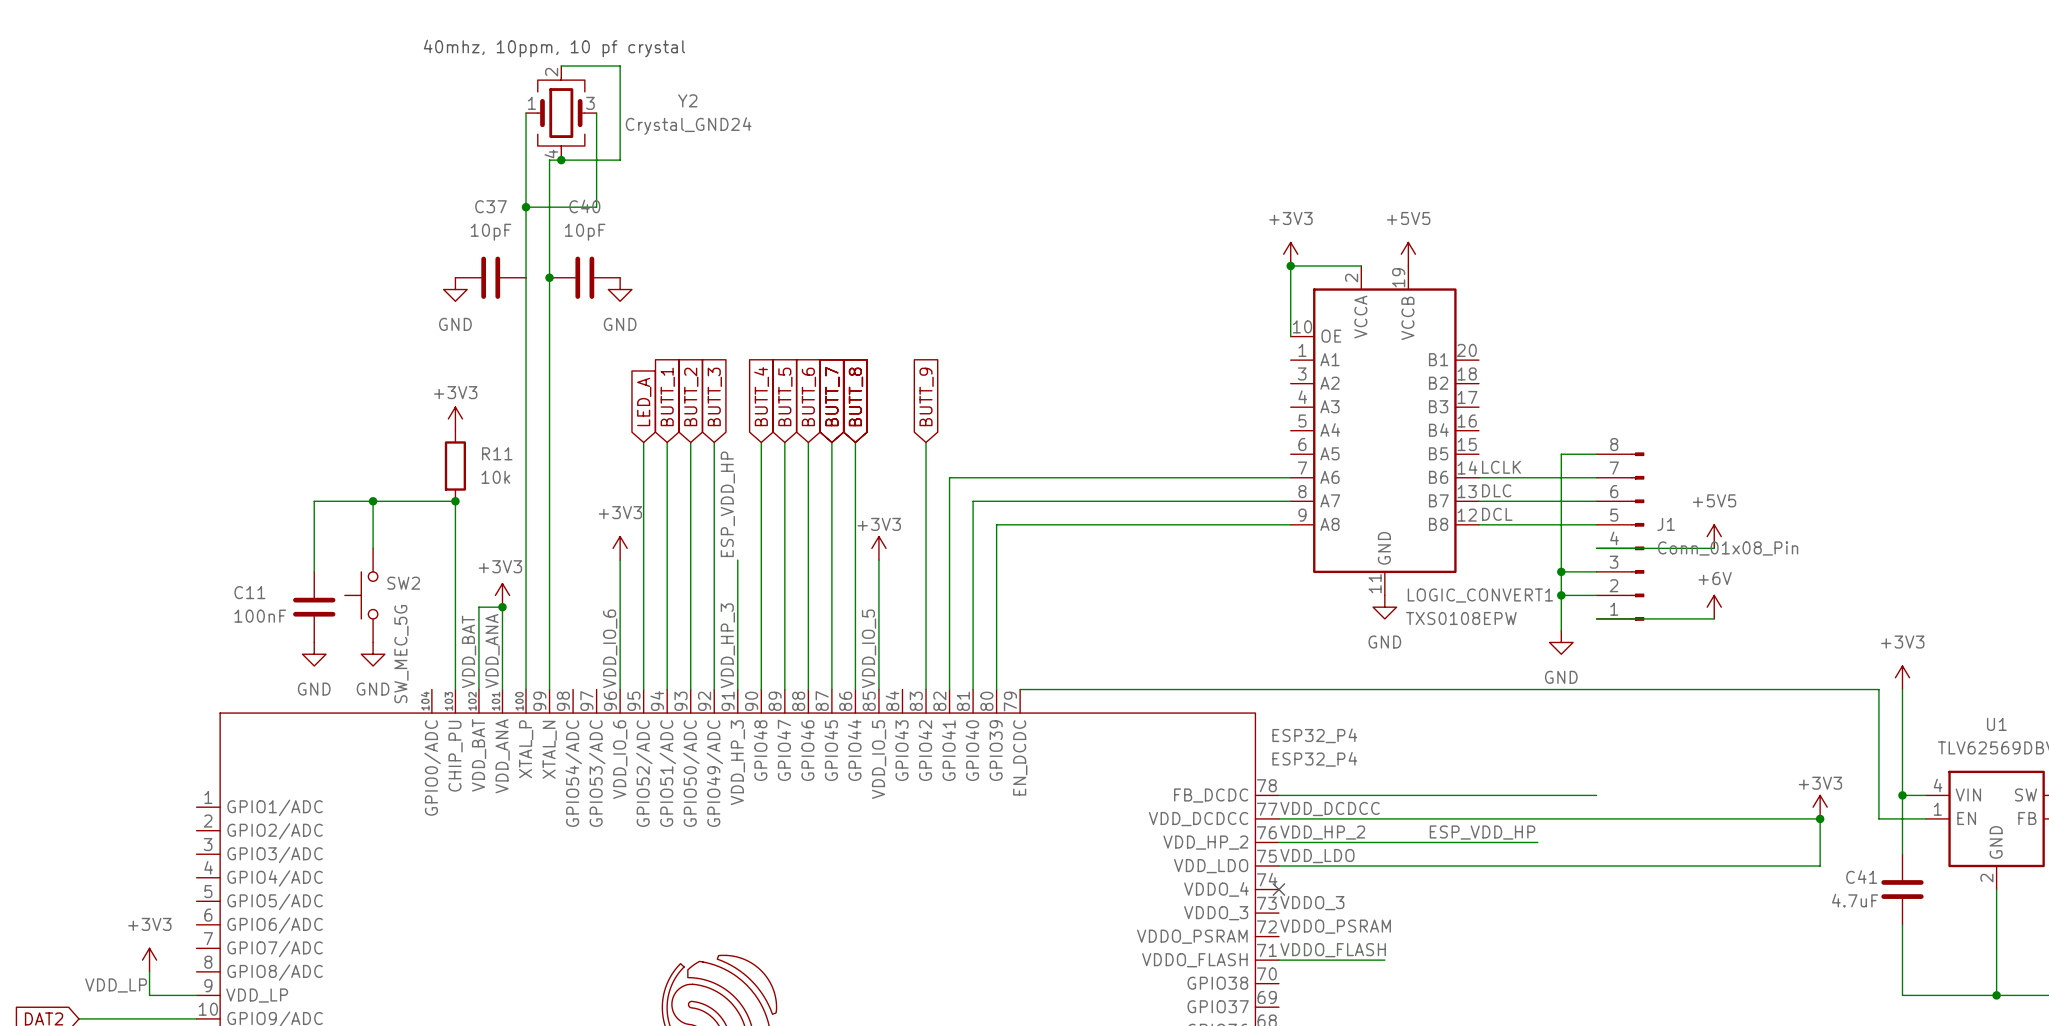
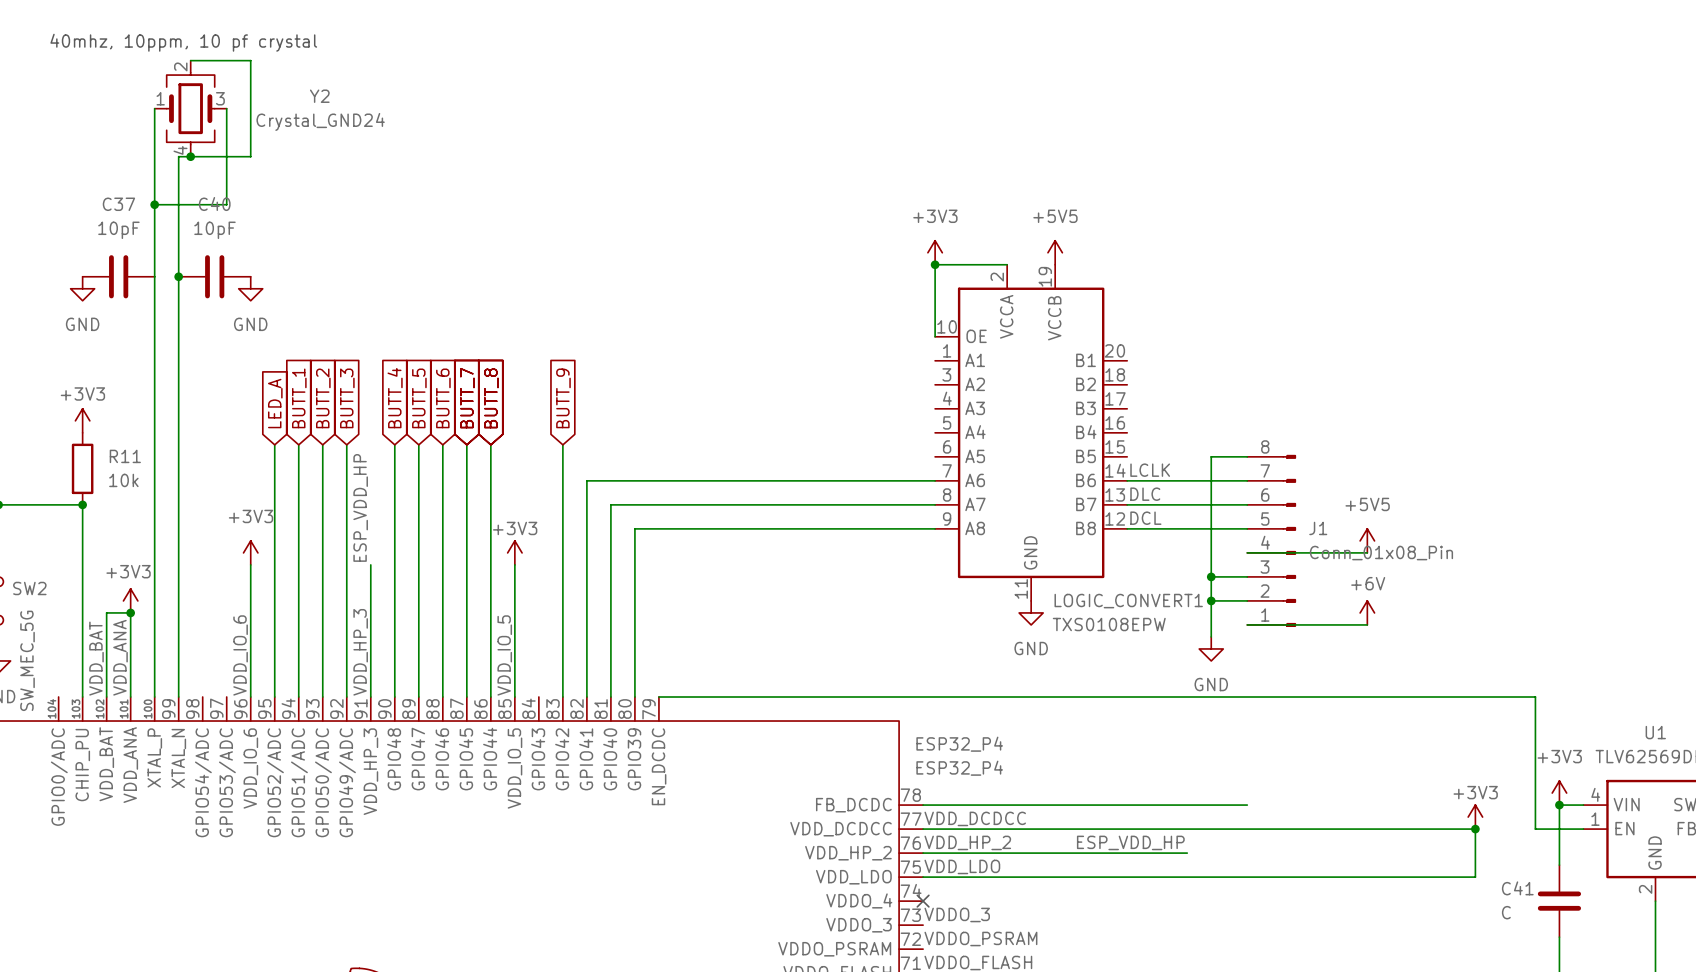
power symbol position: +3V3 (1902, 677) -> +3V3 (1559, 793)
wire: (1902, 689) (1902, 795) -> none
C41 value: 4.7uF (1855, 900) -> C (1506, 912)

